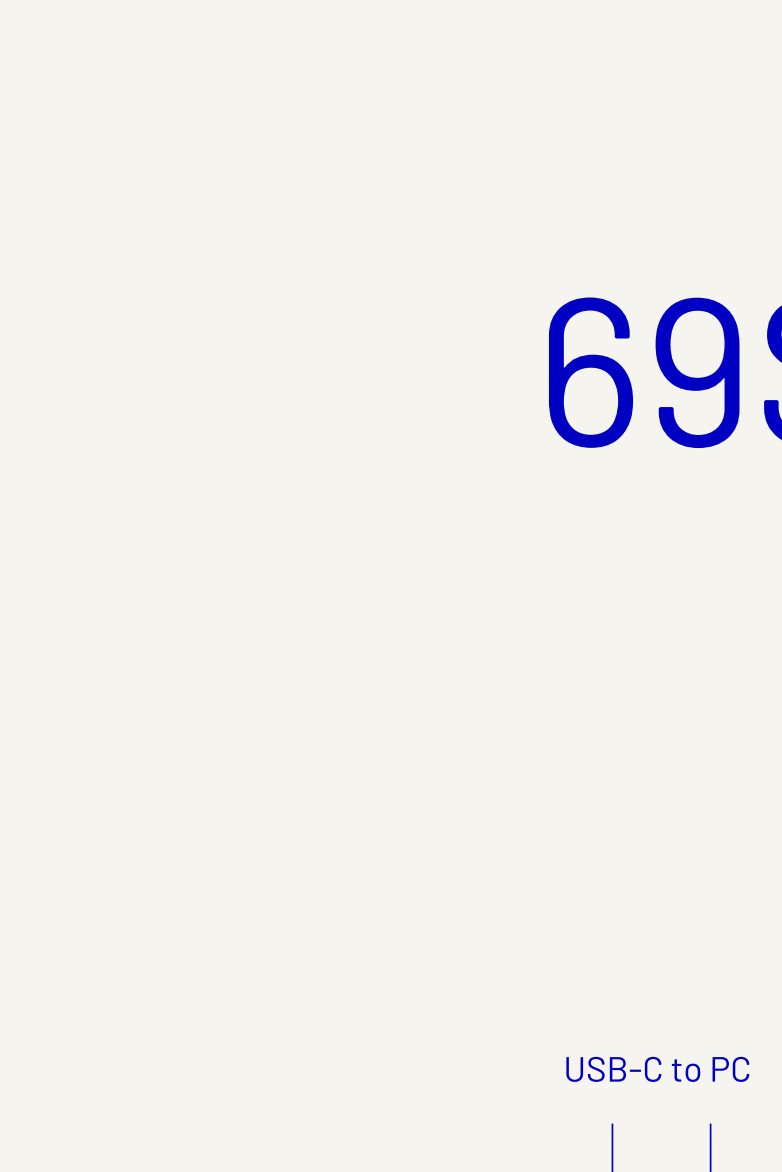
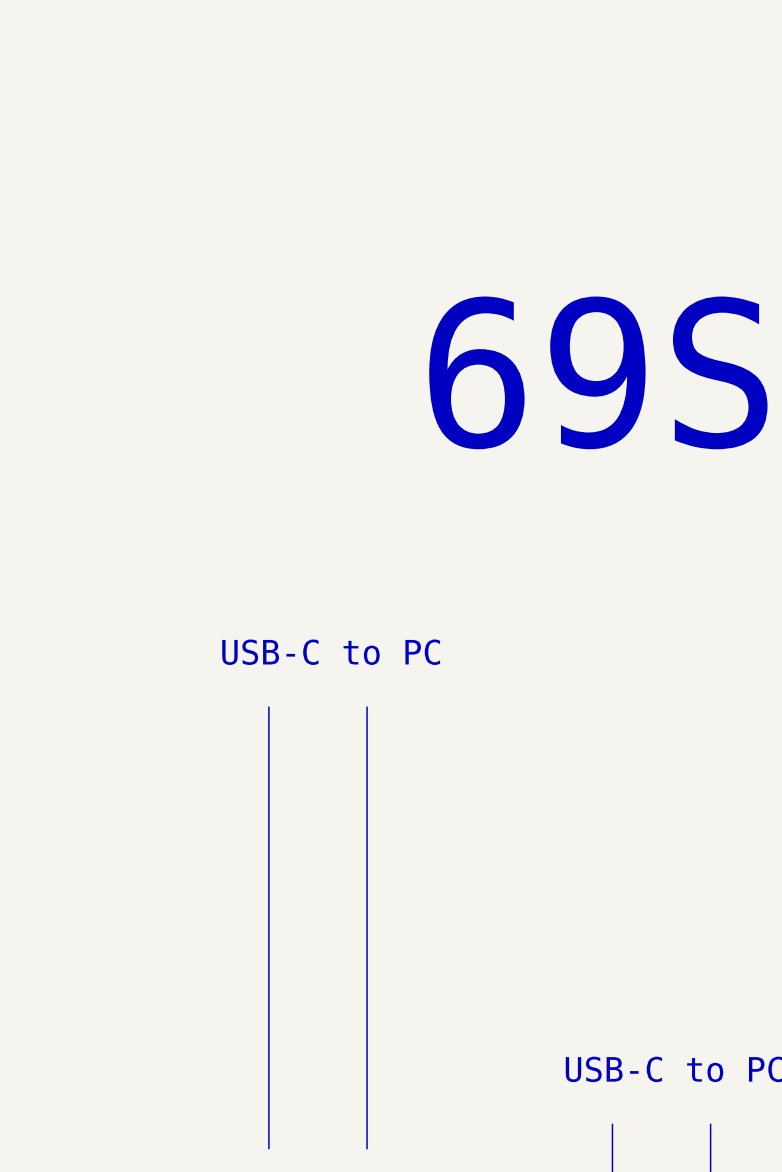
text: none -> USB-C to PC (331, 652)
line: none -> (268, 707) (268, 1148)
line: none -> (367, 707) (367, 1148)

